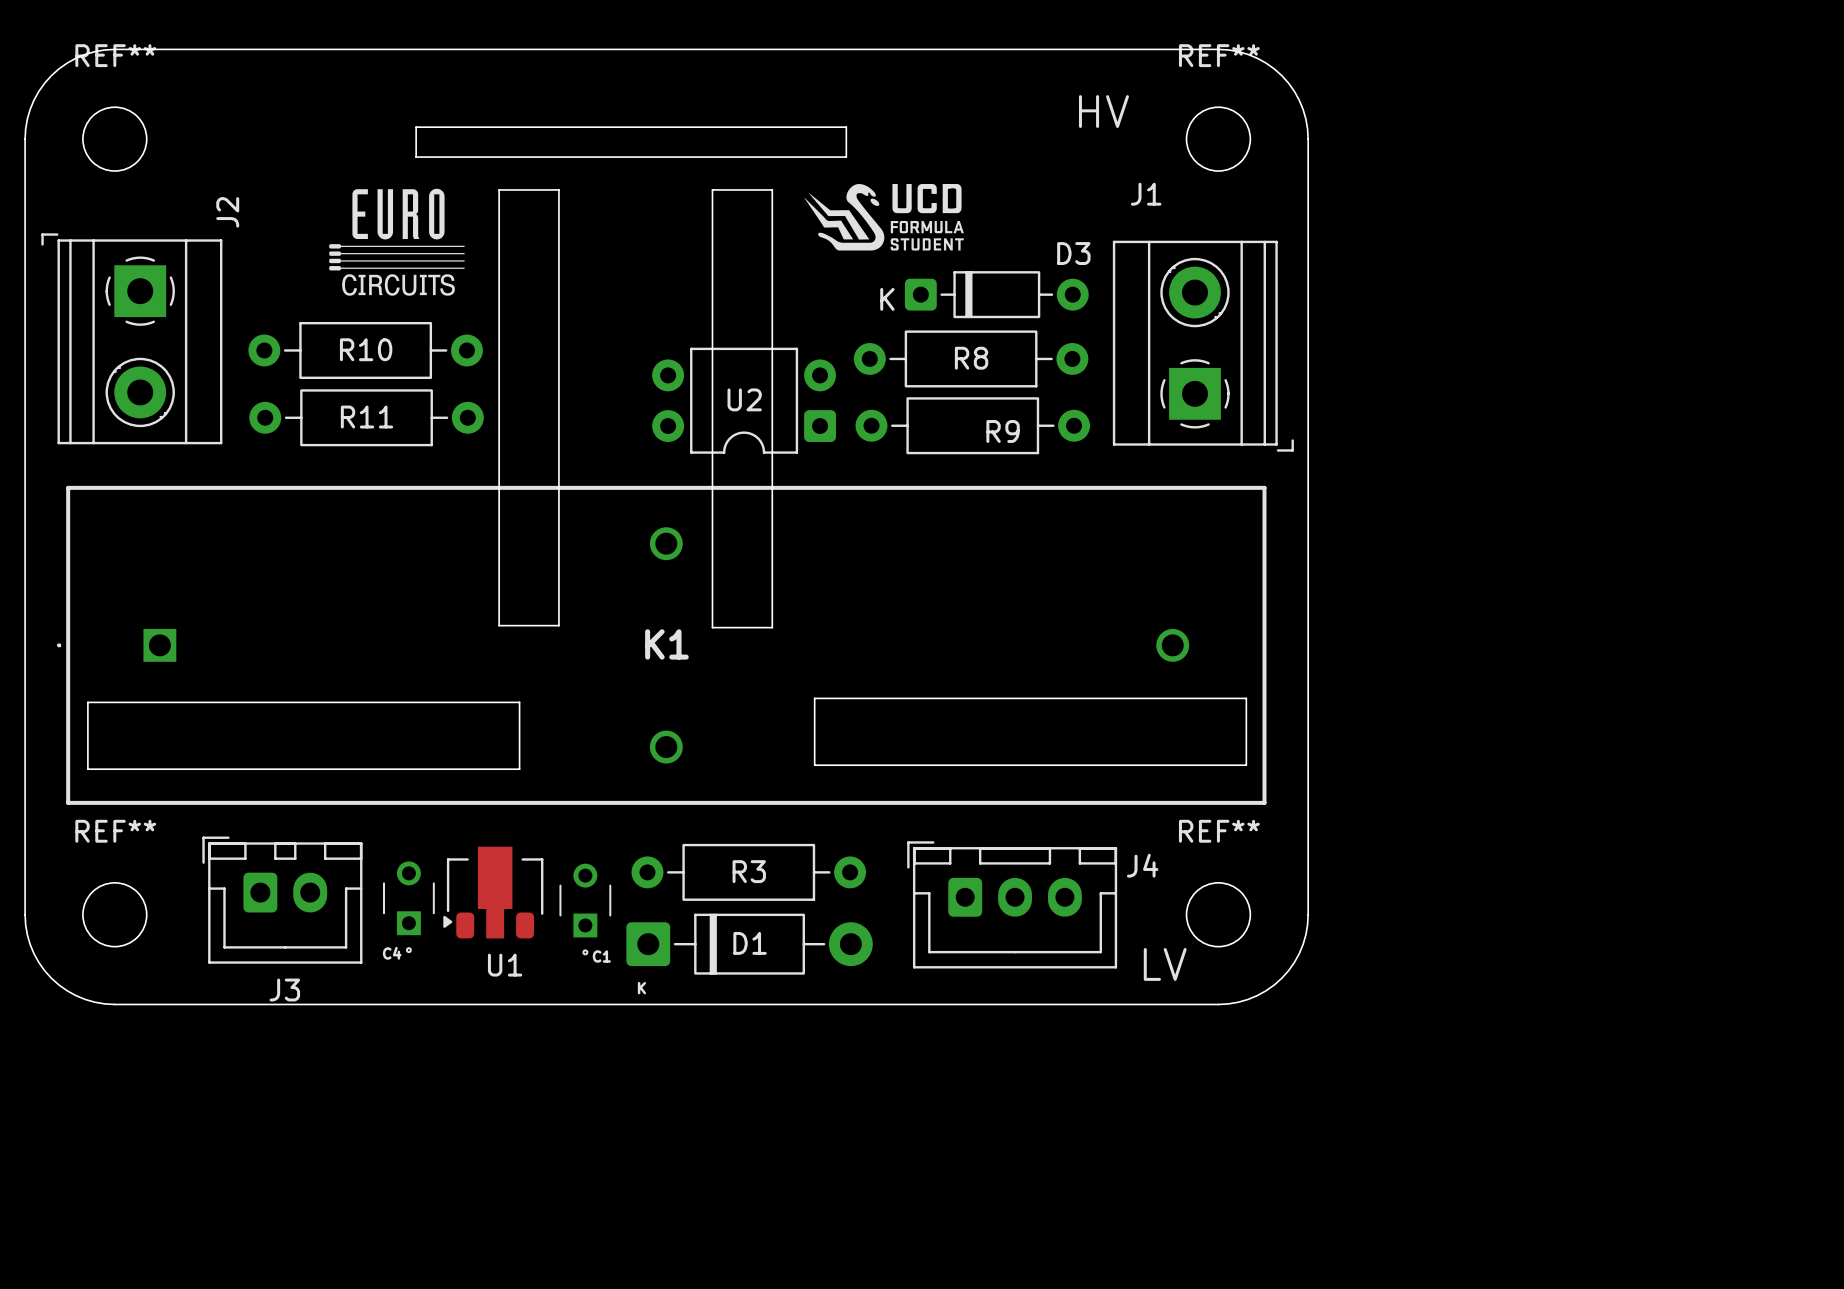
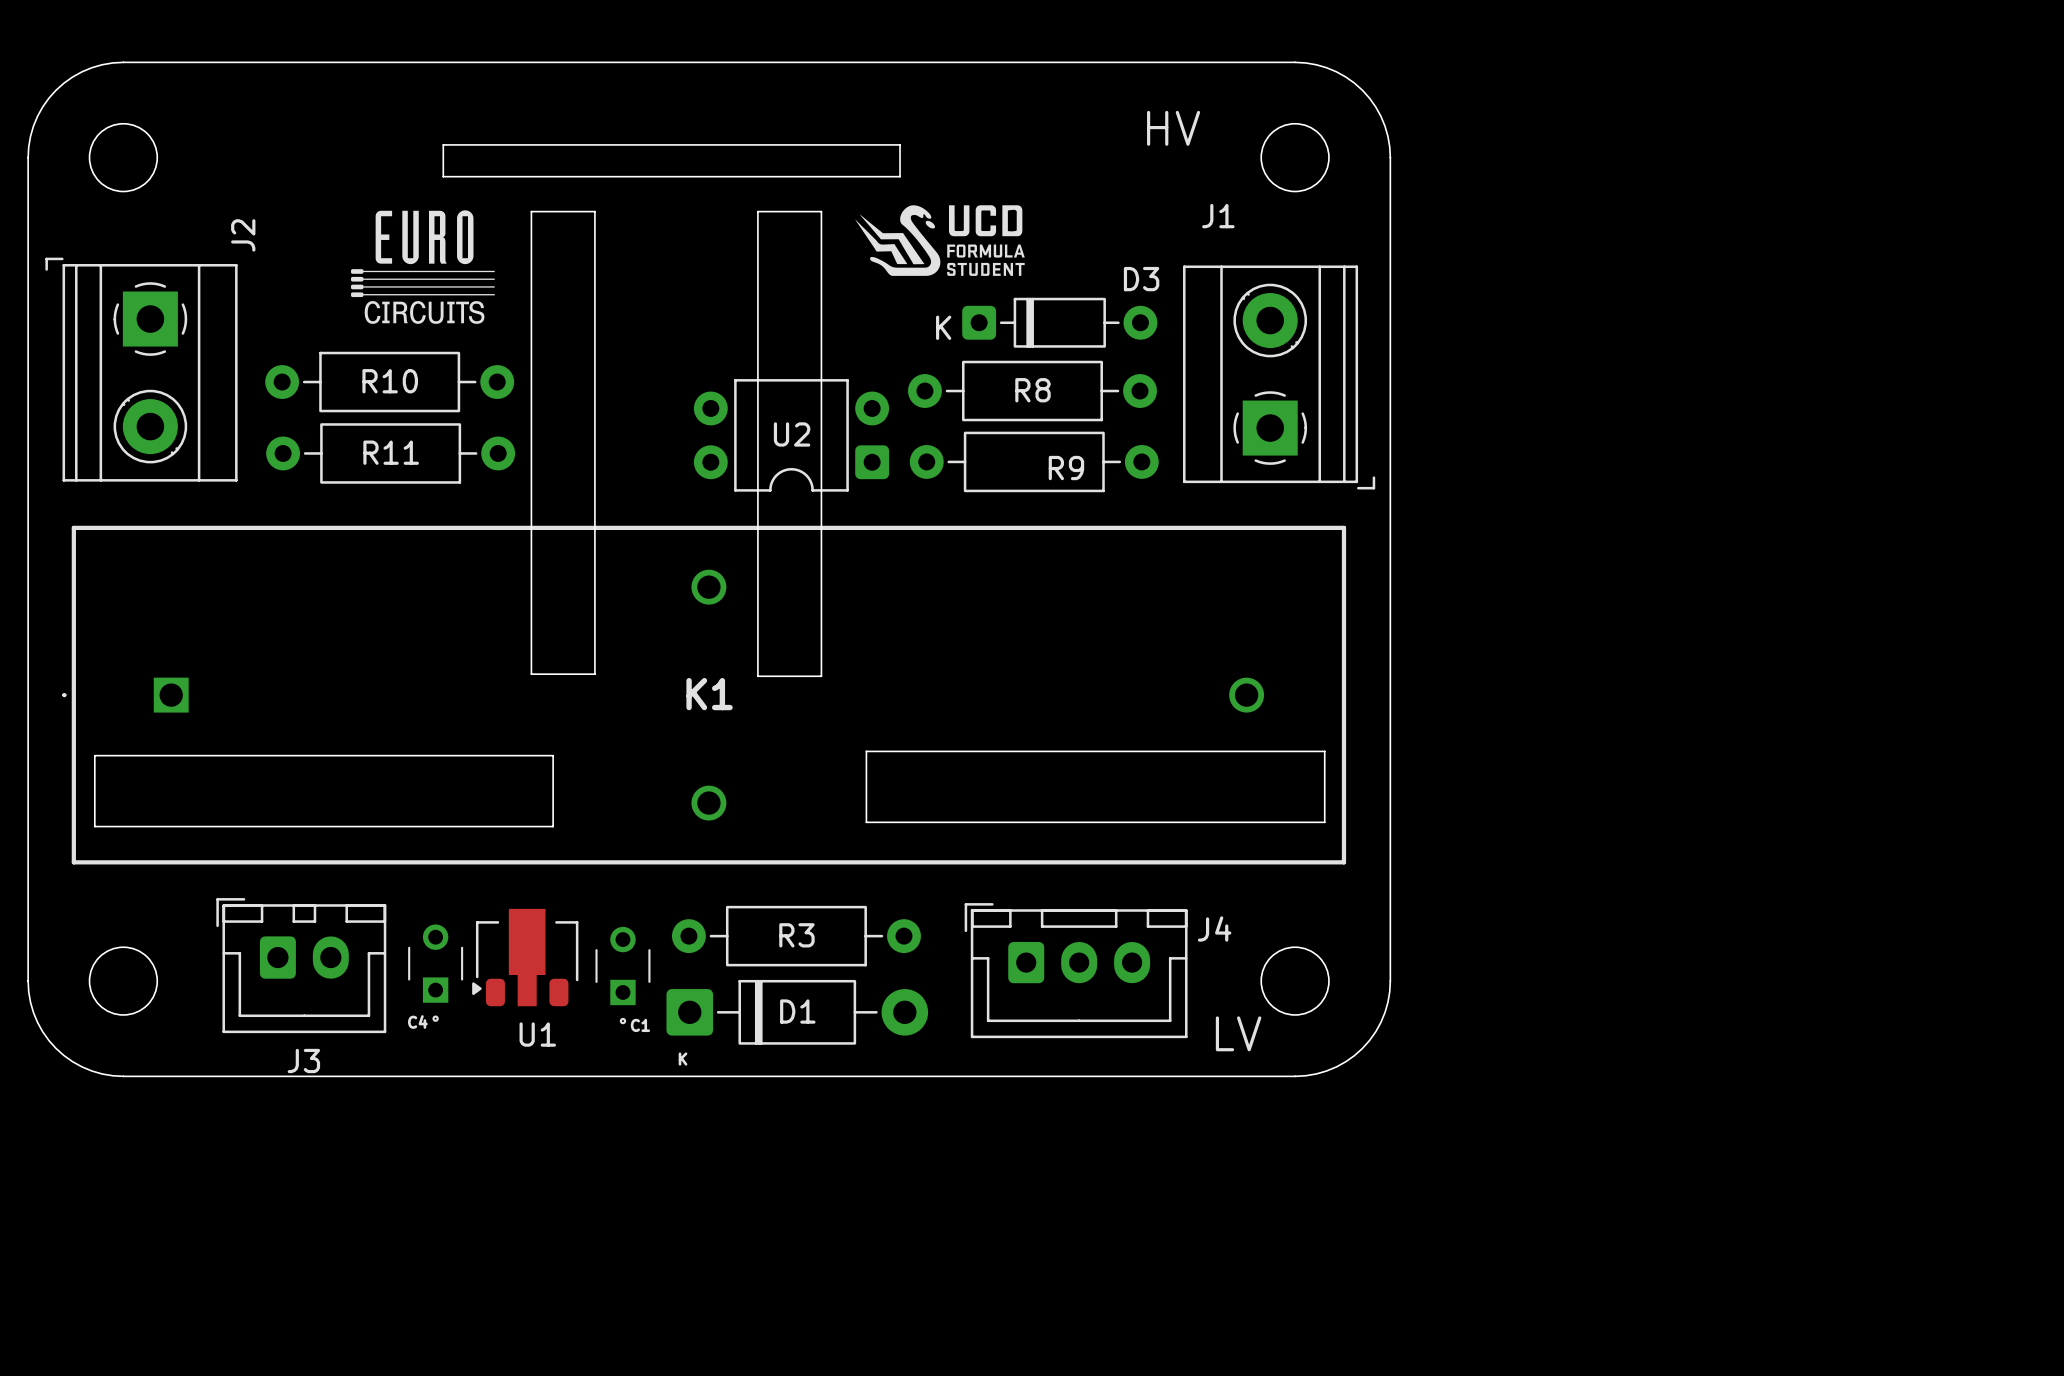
REF** name: REF** (115, 55) -> none
REF** name: REF** (1219, 55) -> none
REF** name: REF** (115, 831) -> none
REF** name: REF** (1219, 831) -> none

